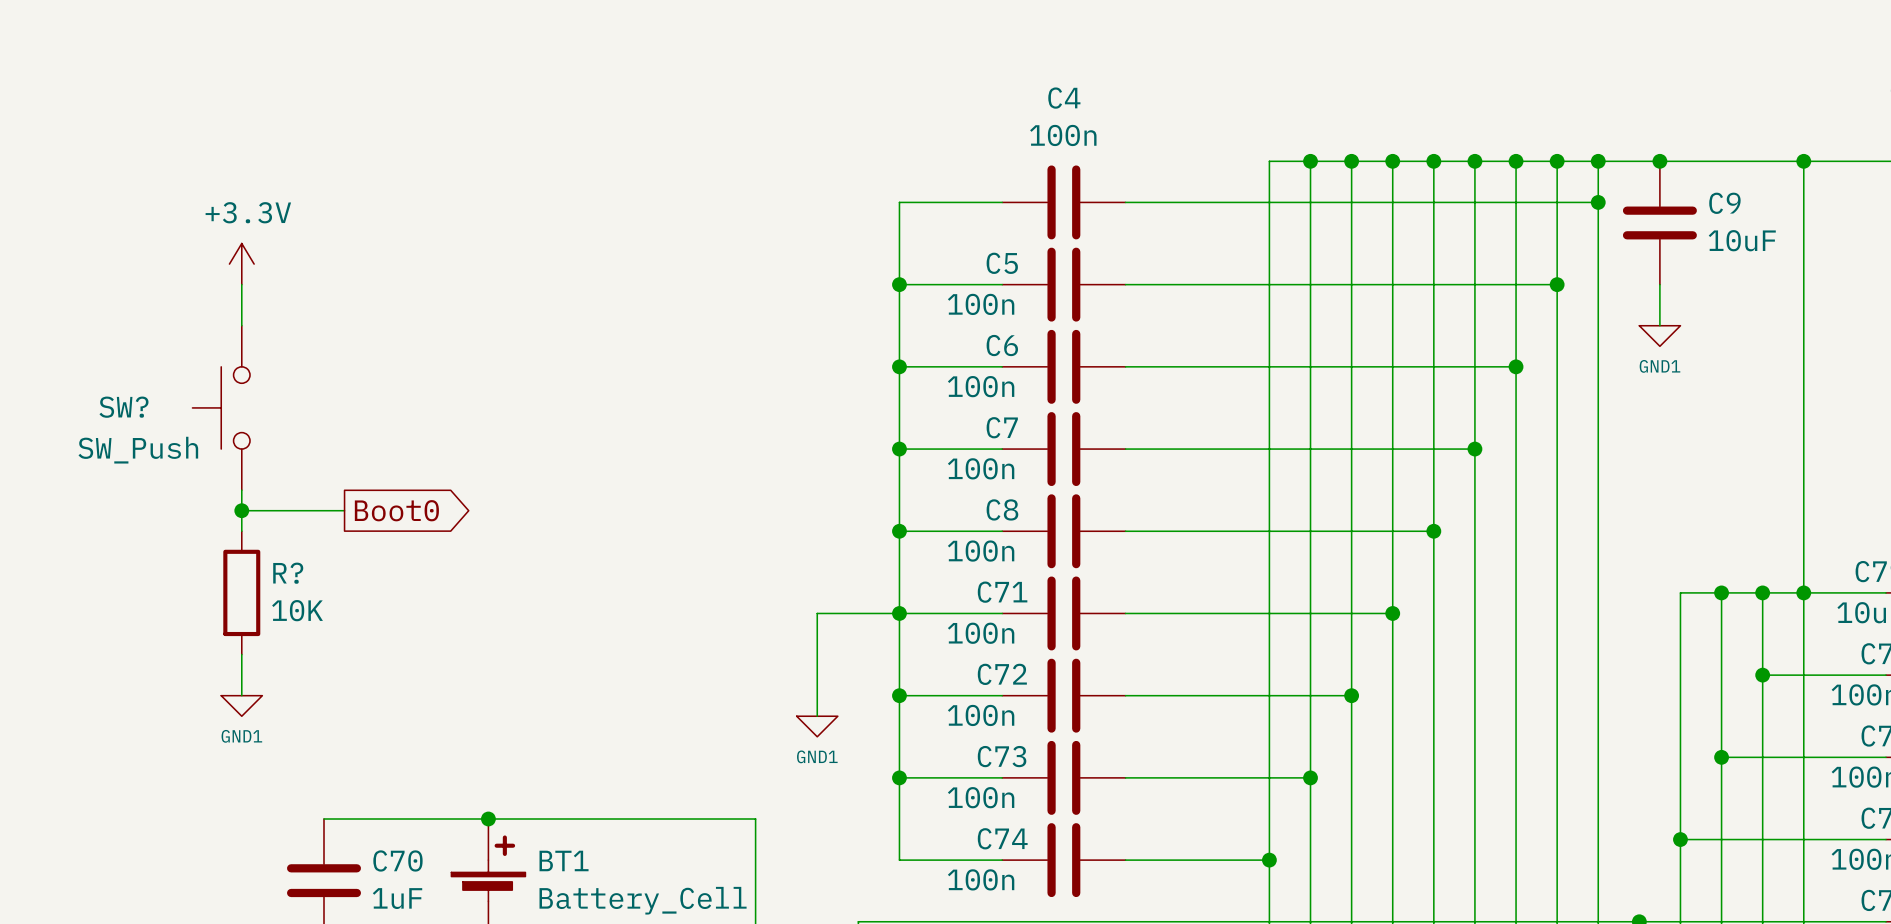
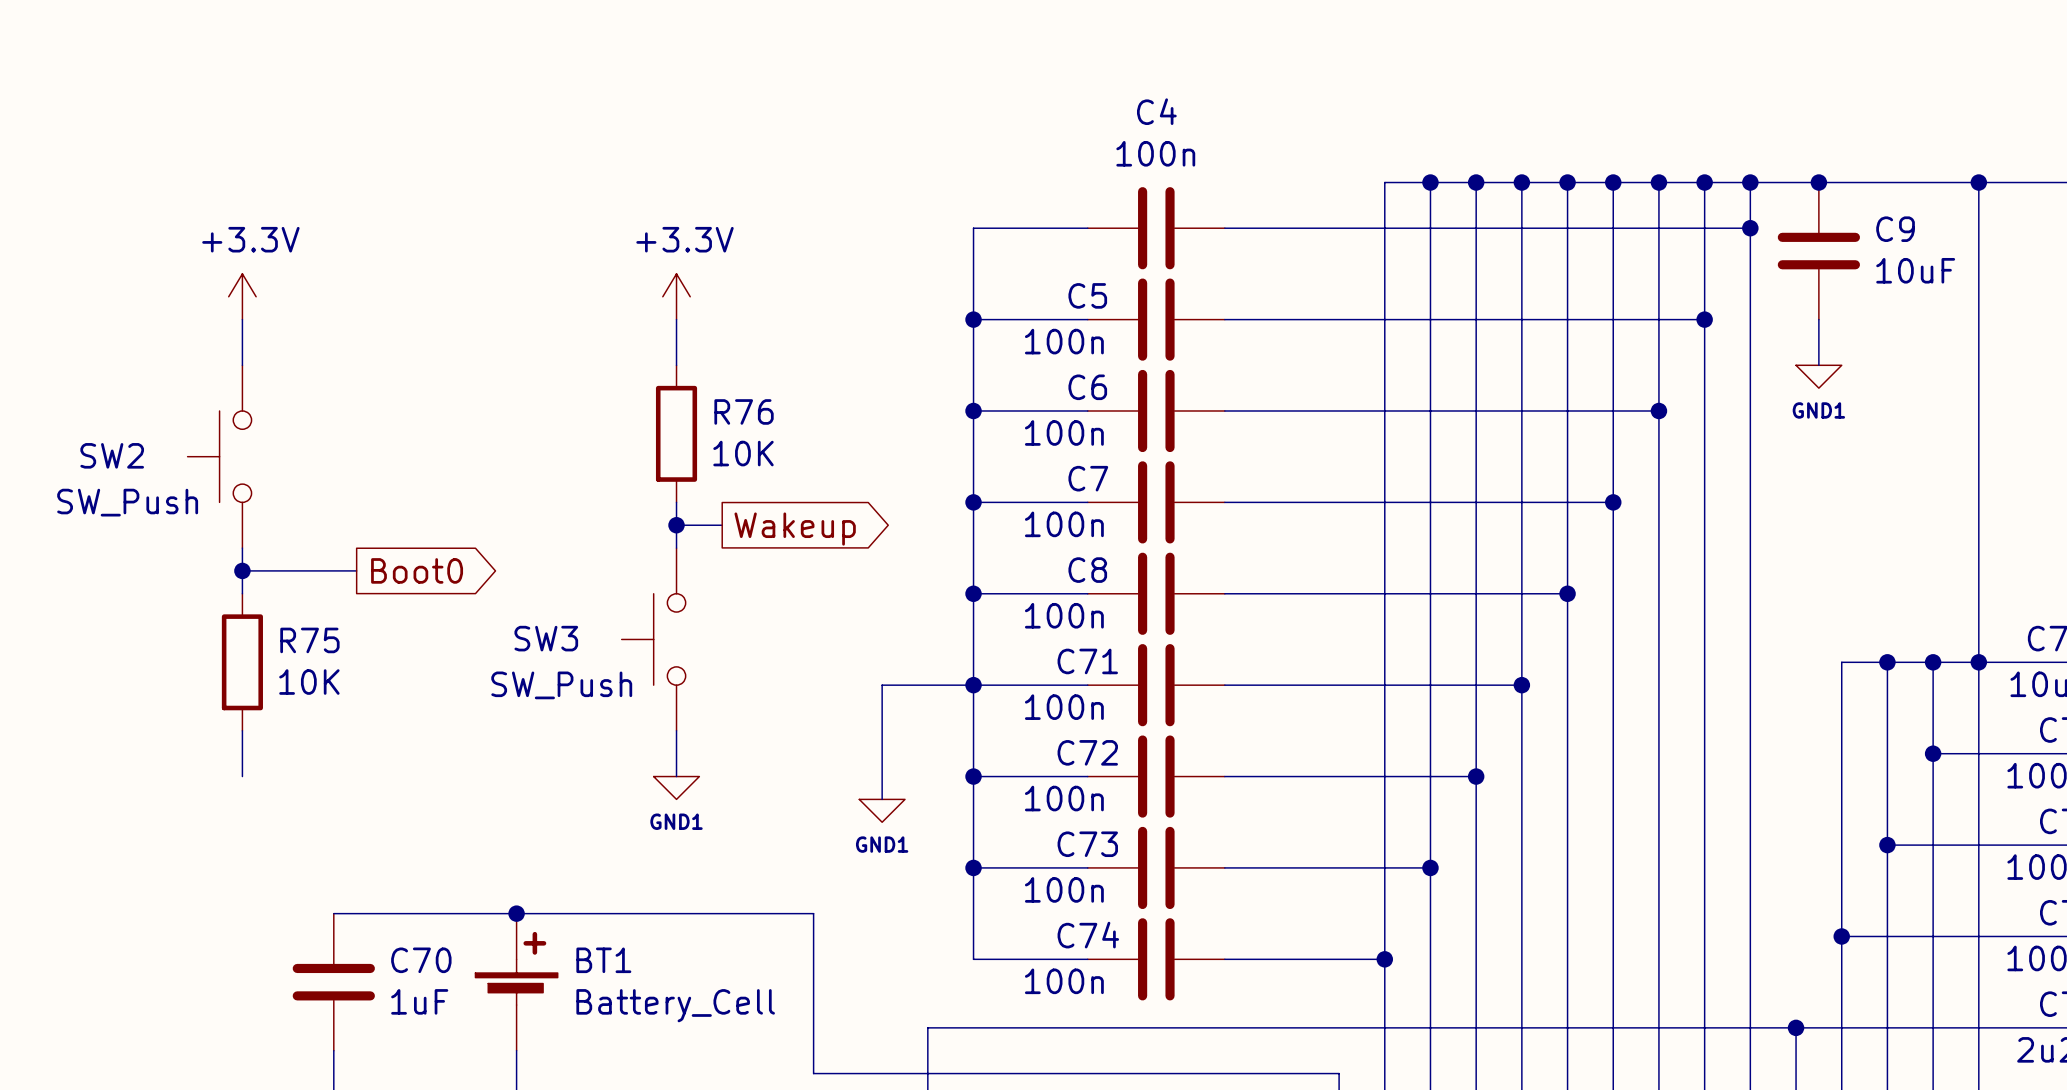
power symbol: none -> +3.3V (676, 296)
wire: none -> (676, 319) (676, 365)
R76: none -> 10K (676, 433)
SW? name: SW? (123, 407) -> SW2 (112, 455)
wire: none -> (676, 502) (676, 548)
wire: none -> (676, 525) (722, 525)
junction: none -> (676, 525)
global label: none -> Wakeup (795, 529)
SW3: none -> SW_Push (653, 639)
R? name: R? (288, 573) -> R75 (309, 640)
wire: none -> (676, 730) (676, 776)
power symbol position: GND1 (241, 705) -> GND1 (676, 787)

